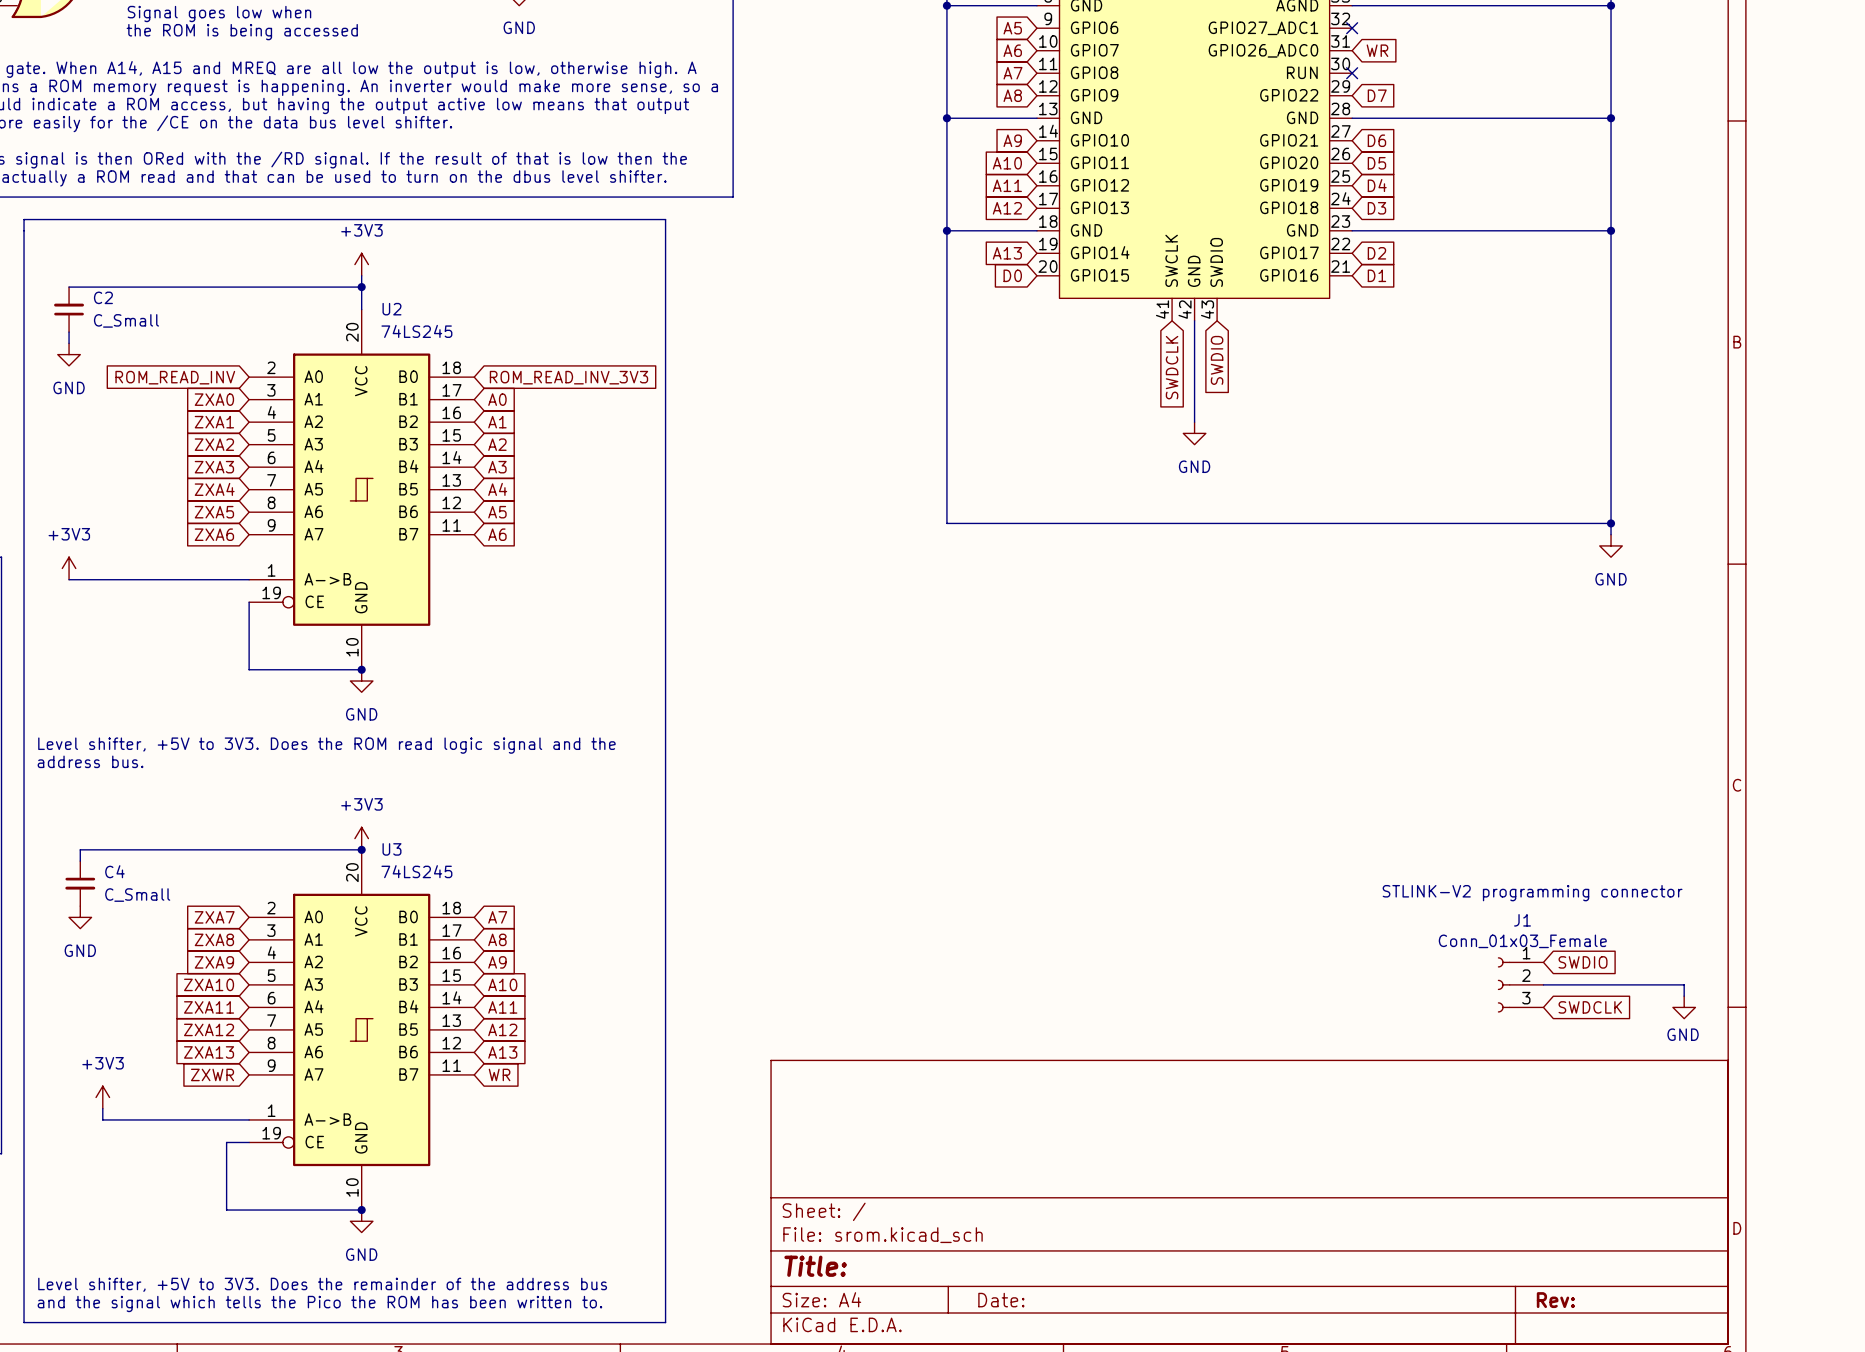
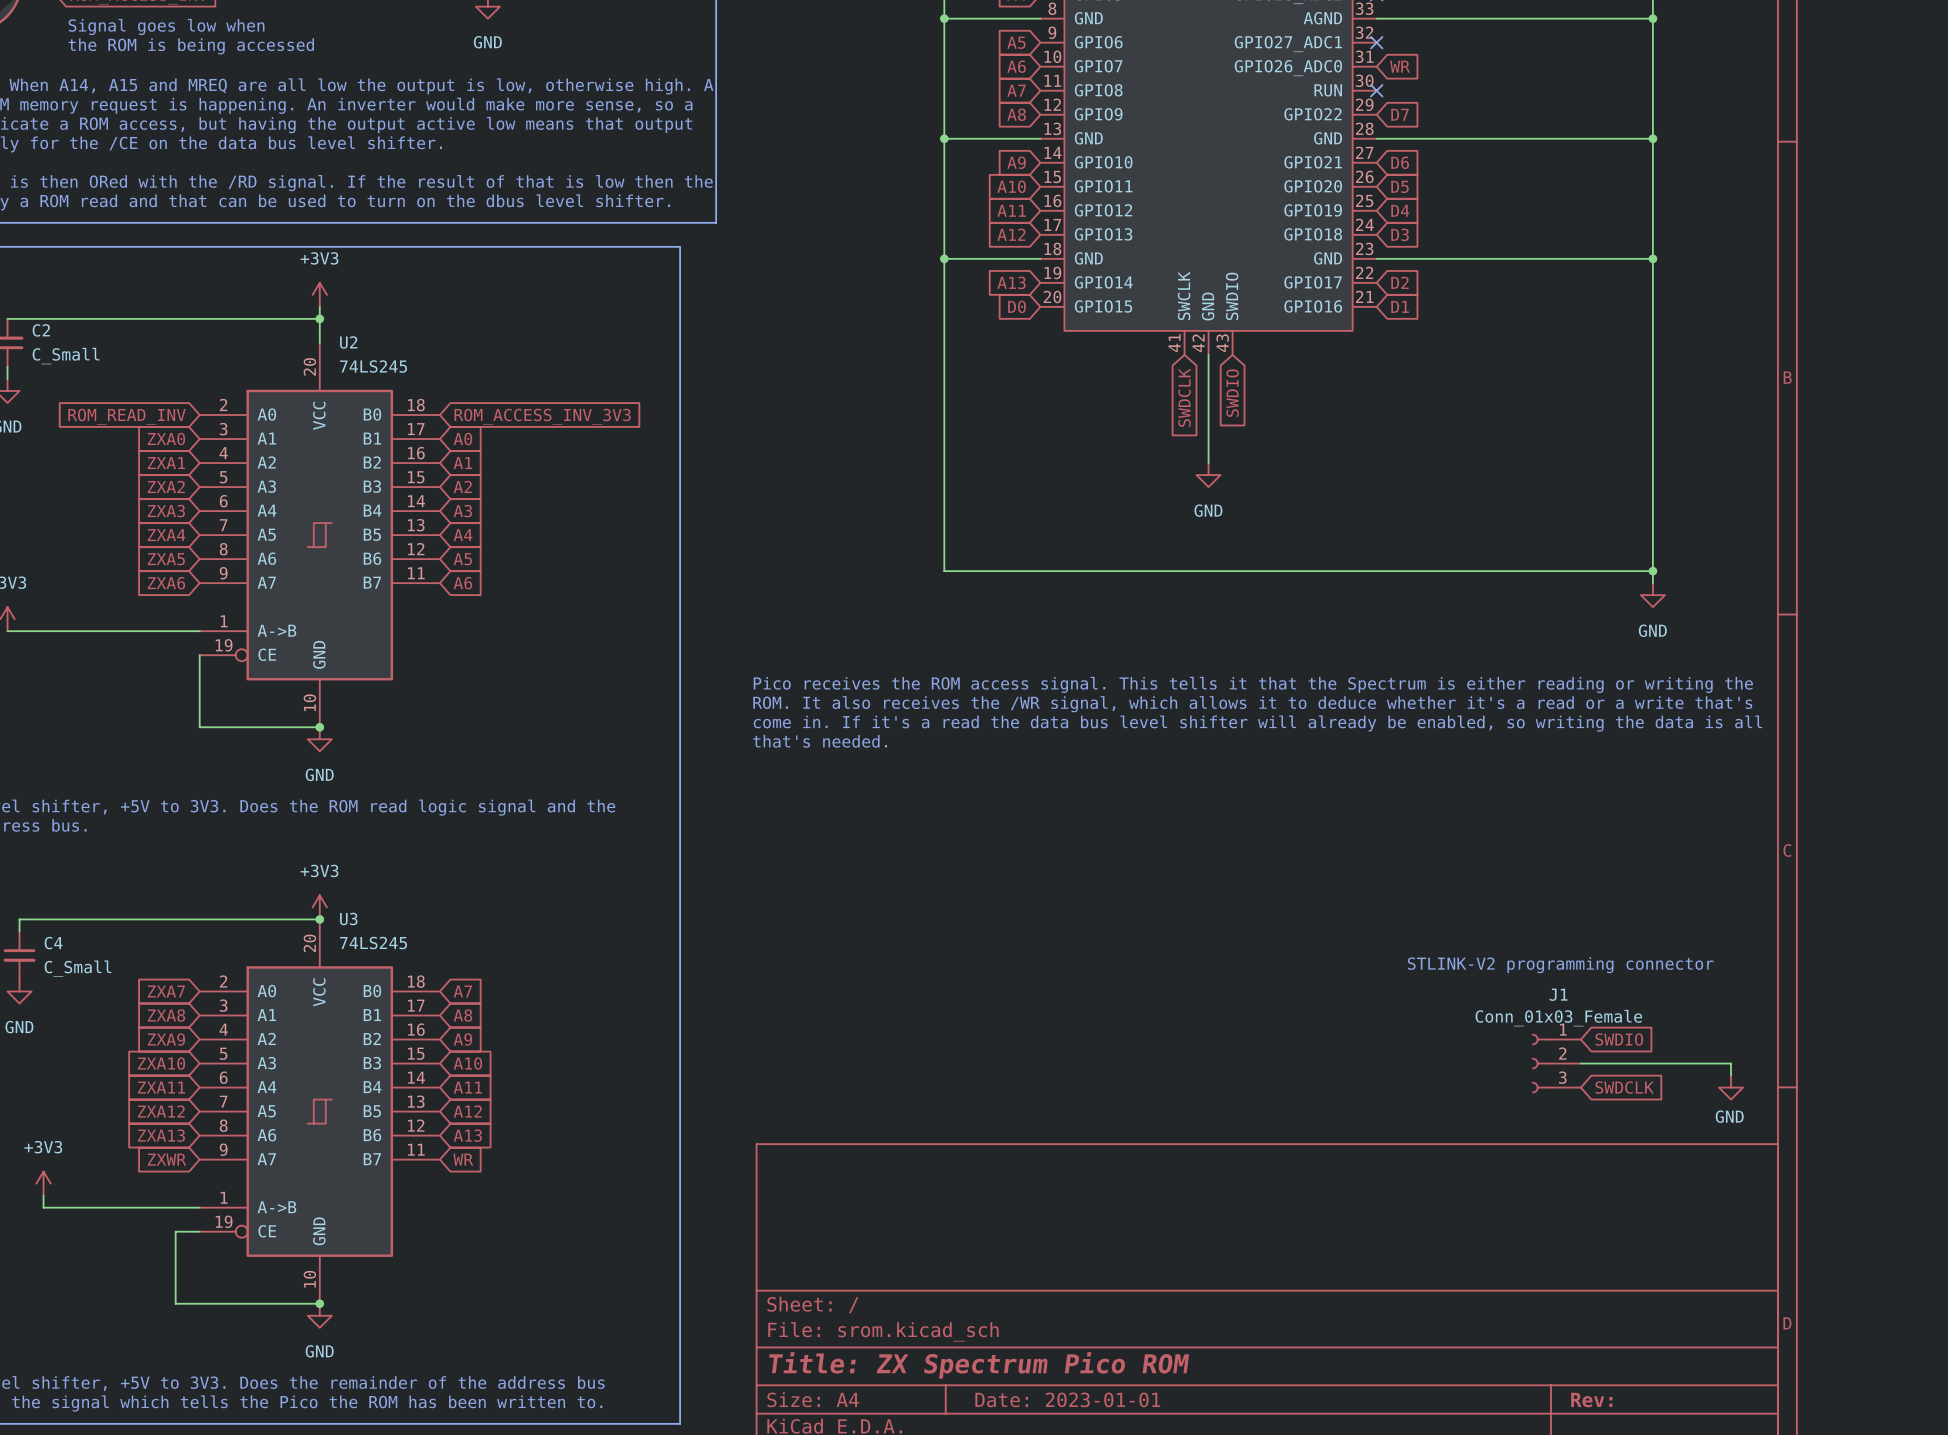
line: (665, 219) (665, 1322) -> (644, 246) (680, 246) (680, 1423) (644, 1423)
global label: ROM_READ_INV_3V3 (568, 377) -> ROM_ACCESS_INV_3V3 (542, 416)
text: none -> Pico receives the ROM access signal. This tells it that the Spectrum is either reading or writing the (1253, 684)
text: none -> ROM. It also receives the /WR signal, which allows it to deduce whether it's a read or a write that's (1252, 704)
text: none -> come in. If it's a read the data bus level shifter will already be enabled, so writing the data is all (1257, 723)
text: none -> that's needed. (820, 741)
title block: Title: (815, 1266) -> Title: ZX Spectrum Pico ROM (979, 1365)
title block: Date: (1001, 1300) -> Date: 2023-01-01 (1067, 1399)

